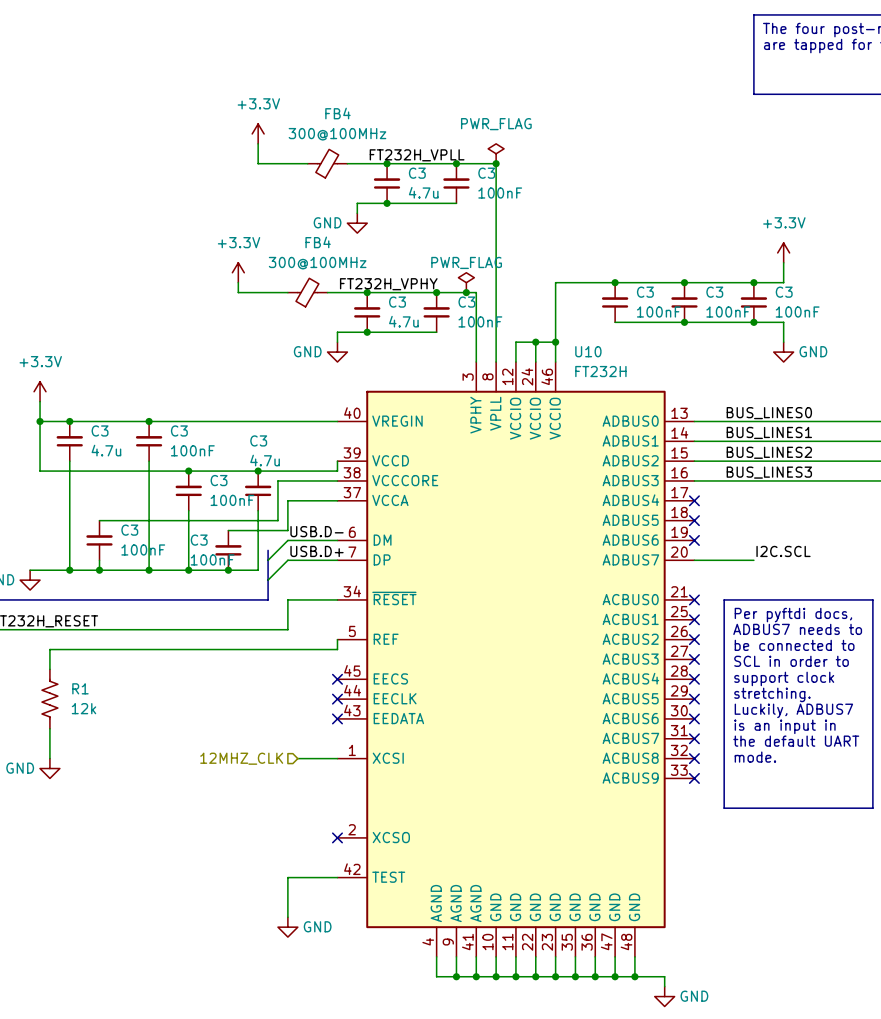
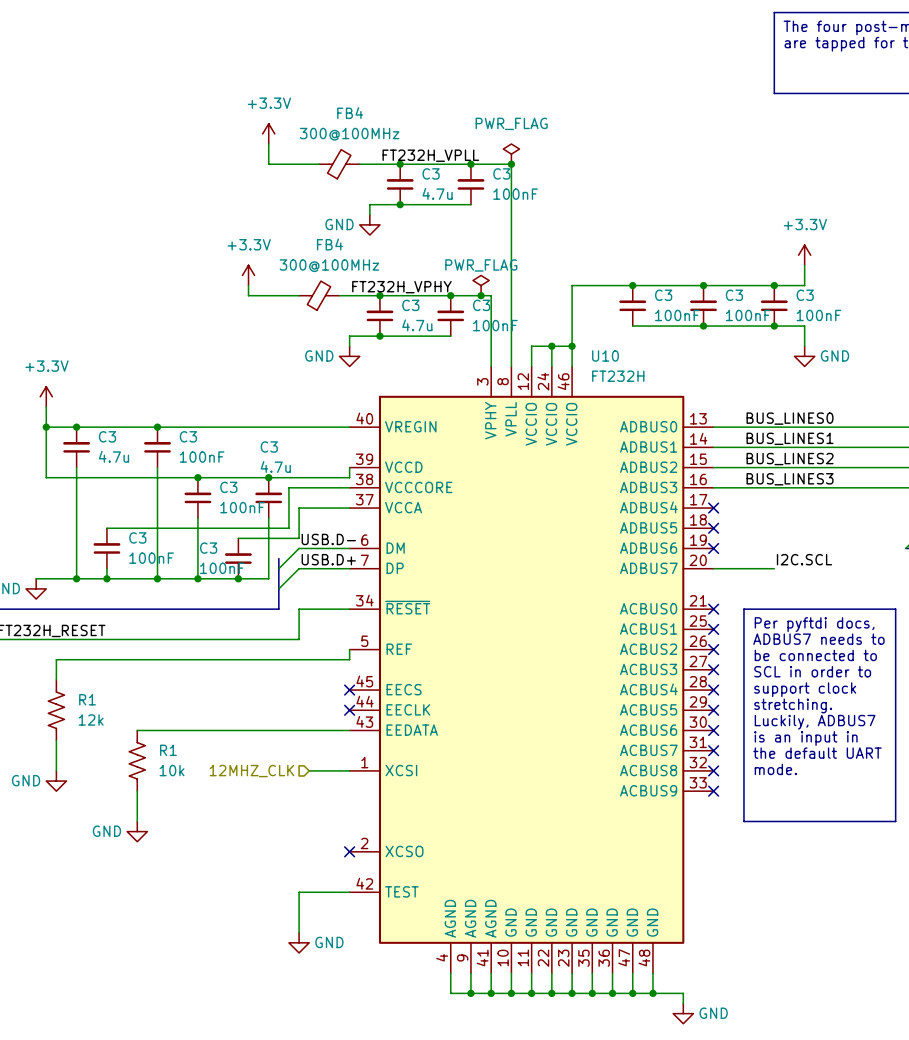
wire: none -> (137, 730) (349, 730)
no-connect mark: (337, 718) -> none
R1: none -> 10k (137, 760)
wire: none -> (137, 791) (137, 821)
power symbol: none -> GND (137, 831)

